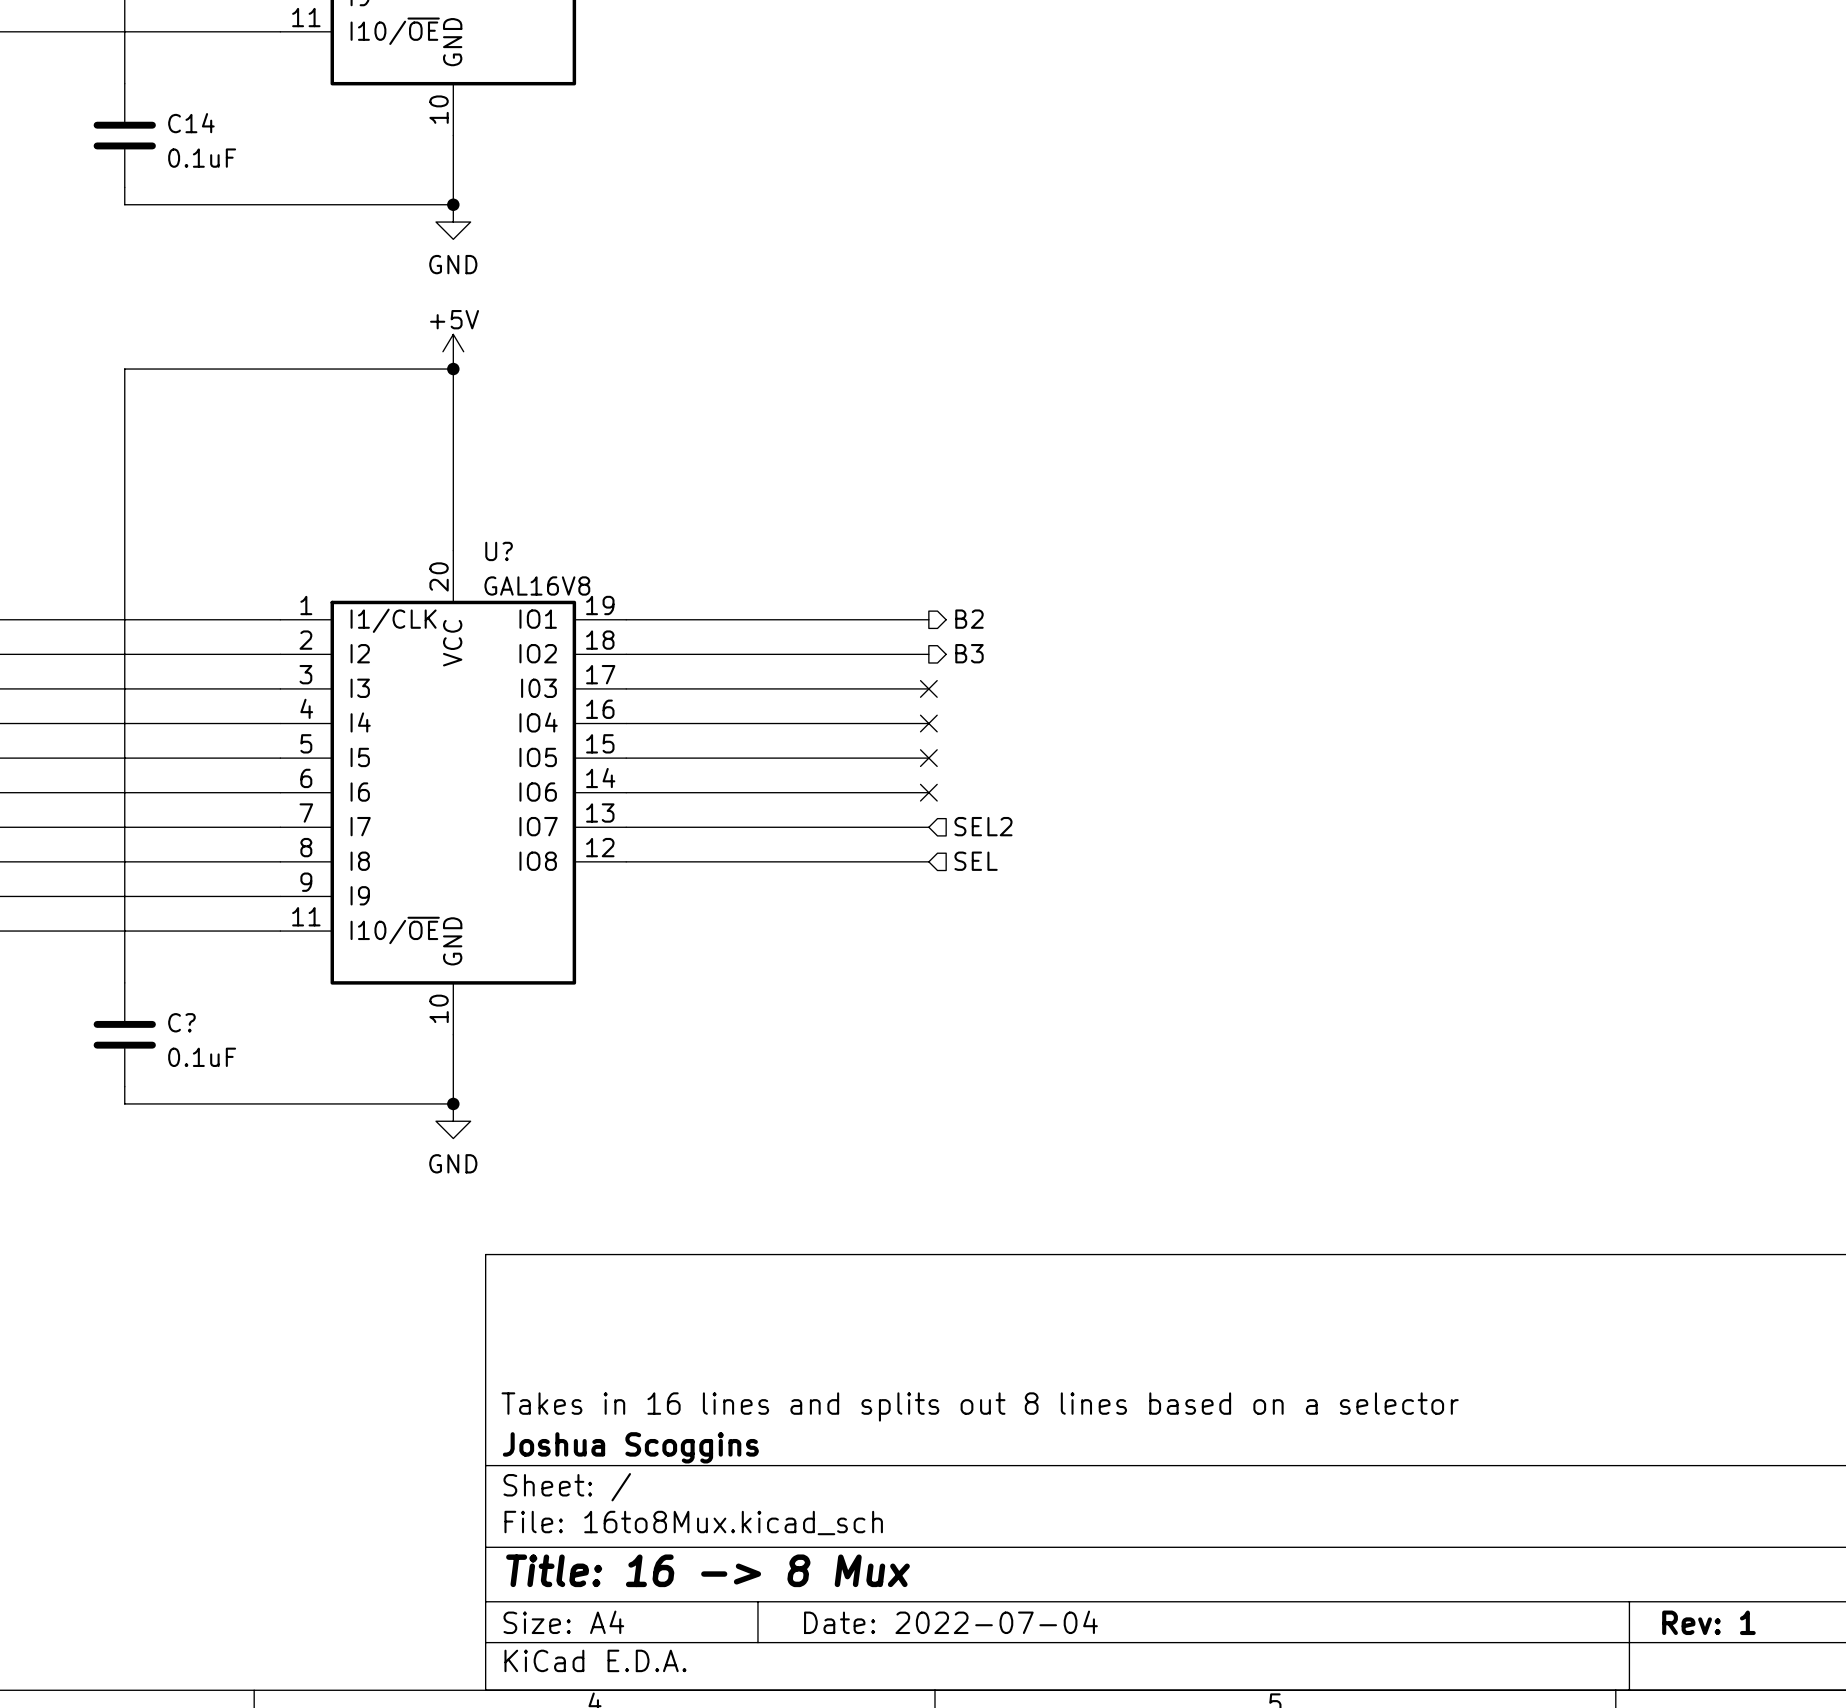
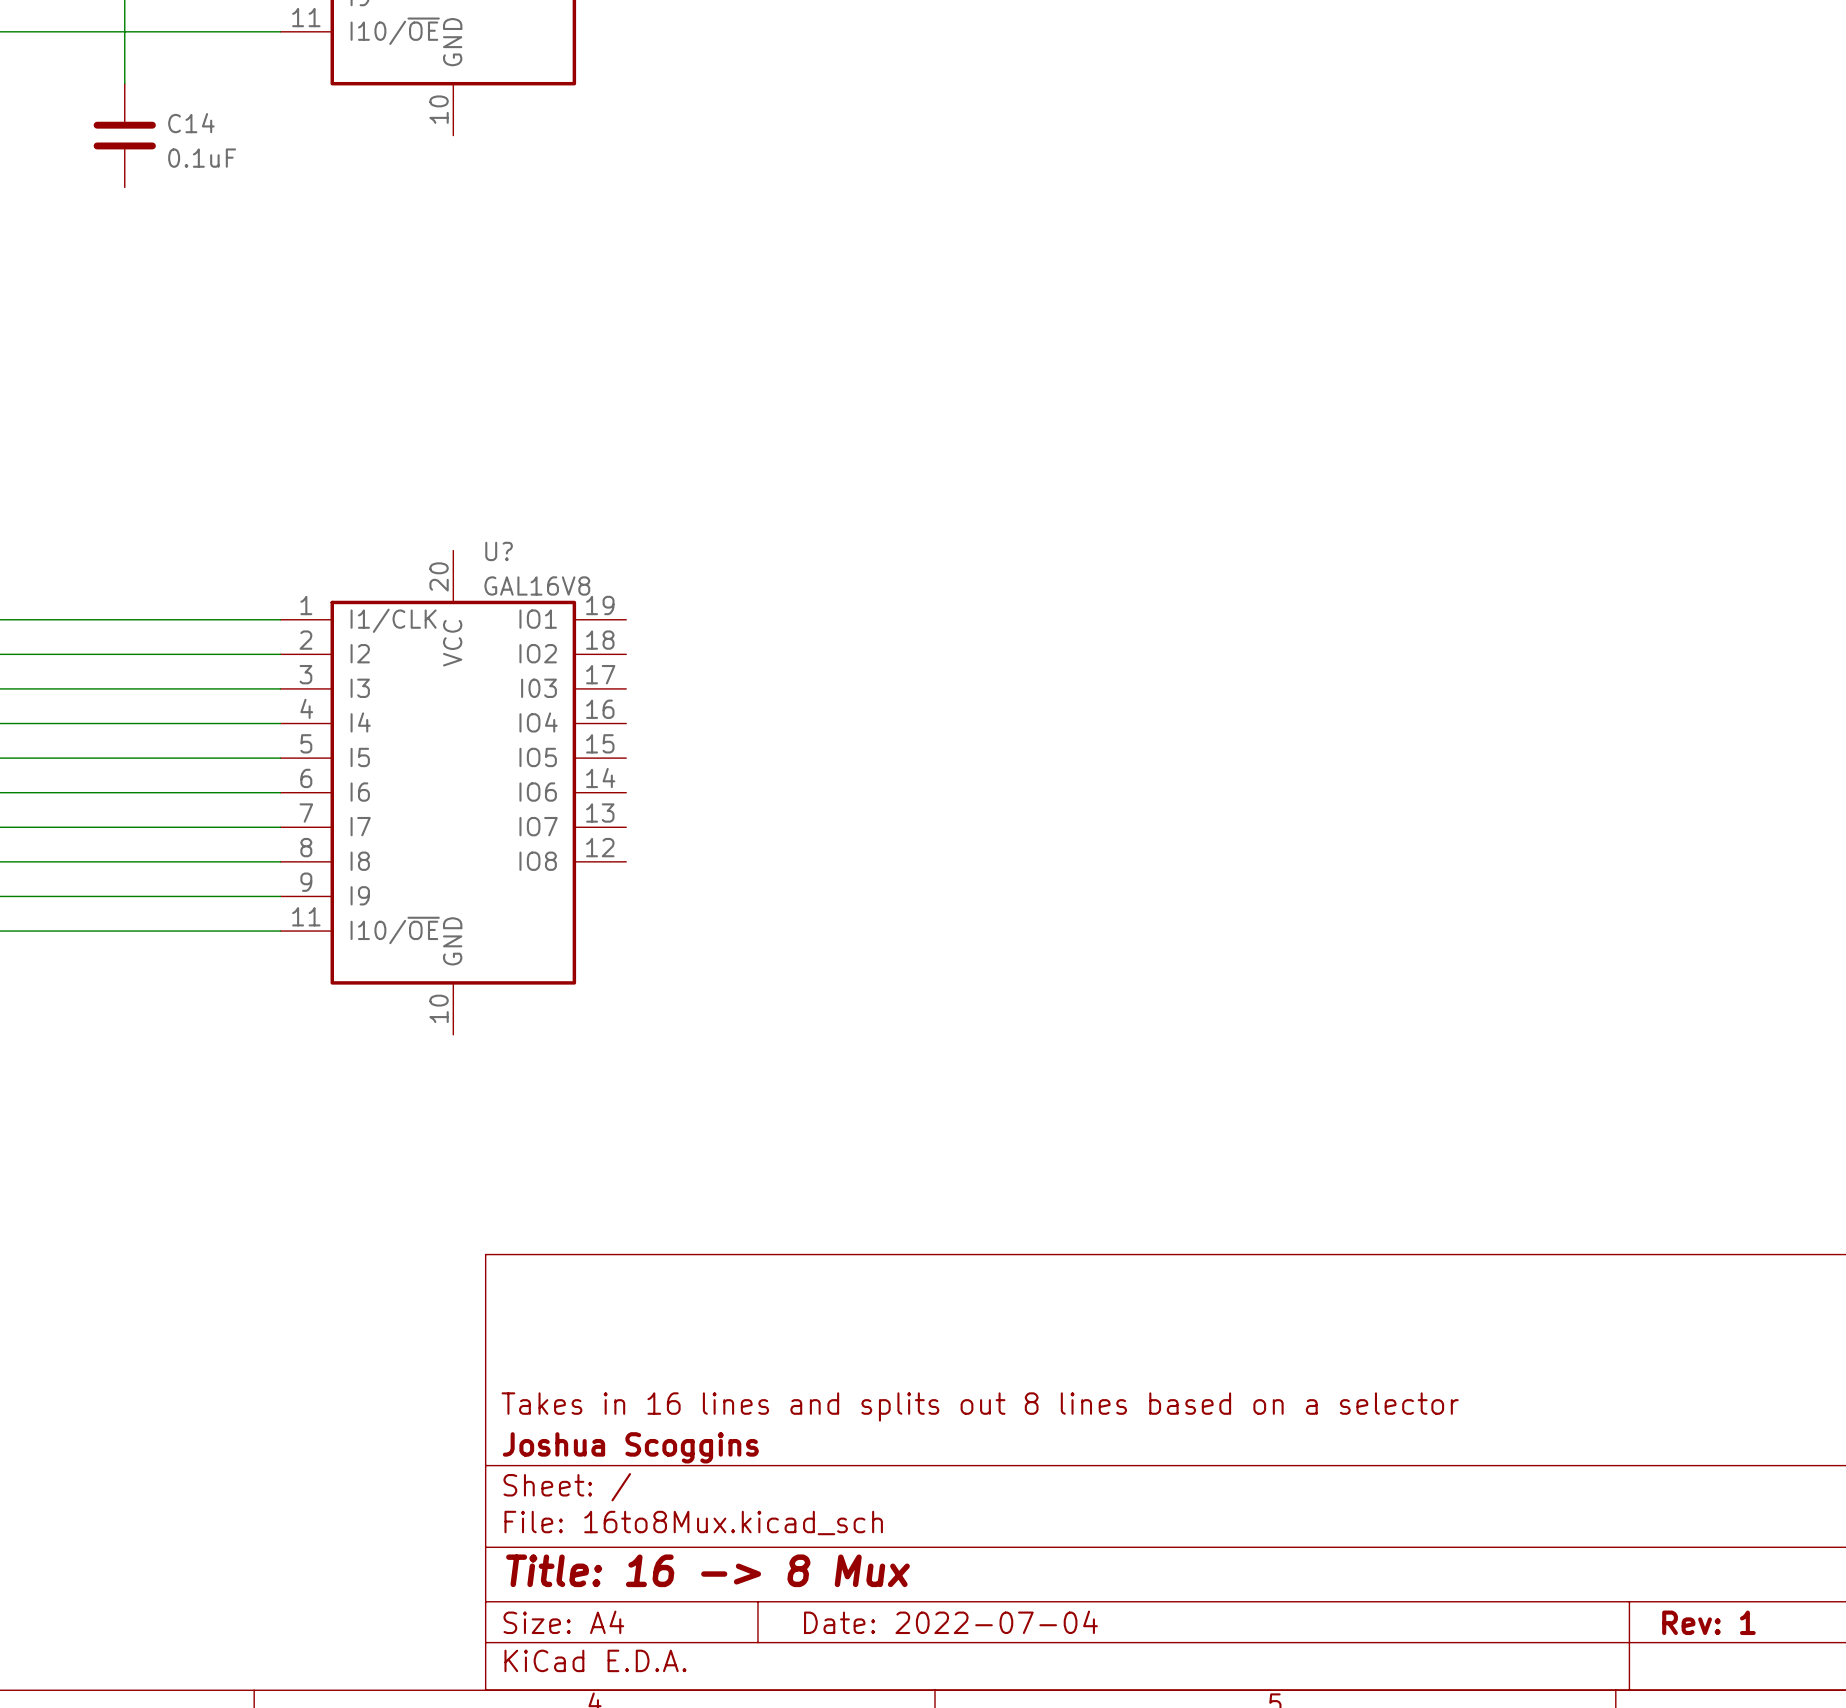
wire: (453, 135) (453, 204) (124, 204) (124, 187) -> none
junction: (453, 204) -> none
power symbol: GND (453, 222) -> none
power symbol: +5V (453, 351) -> none
junction: (453, 369) -> none
wire: (453, 550) (453, 369) (124, 369) (124, 982) -> none
wire: (626, 619) (928, 619) -> none
hierarchical label: B2 (969, 619) -> none
hierarchical label: B3 (969, 653) -> none
wire: (626, 654) (928, 654) -> none
wire: (626, 688) (928, 688) -> none
no-connect mark: (928, 688) -> none
wire: (626, 723) (928, 723) -> none
no-connect mark: (928, 723) -> none
wire: (626, 758) (928, 758) -> none
no-connect mark: (928, 758) -> none
wire: (626, 792) (928, 792) -> none
no-connect mark: (928, 792) -> none
hierarchical label: SEL2 (983, 826) -> none
wire: (626, 827) (928, 827) -> none
wire: (626, 861) (928, 861) -> none
hierarchical label: SEL (976, 861) -> none
C?: 0.1uF (124, 1034) -> none
wire: (453, 1034) (453, 1103) (124, 1103) (124, 1086) -> none
junction: (453, 1103) -> none
power symbol: GND (453, 1121) -> none

